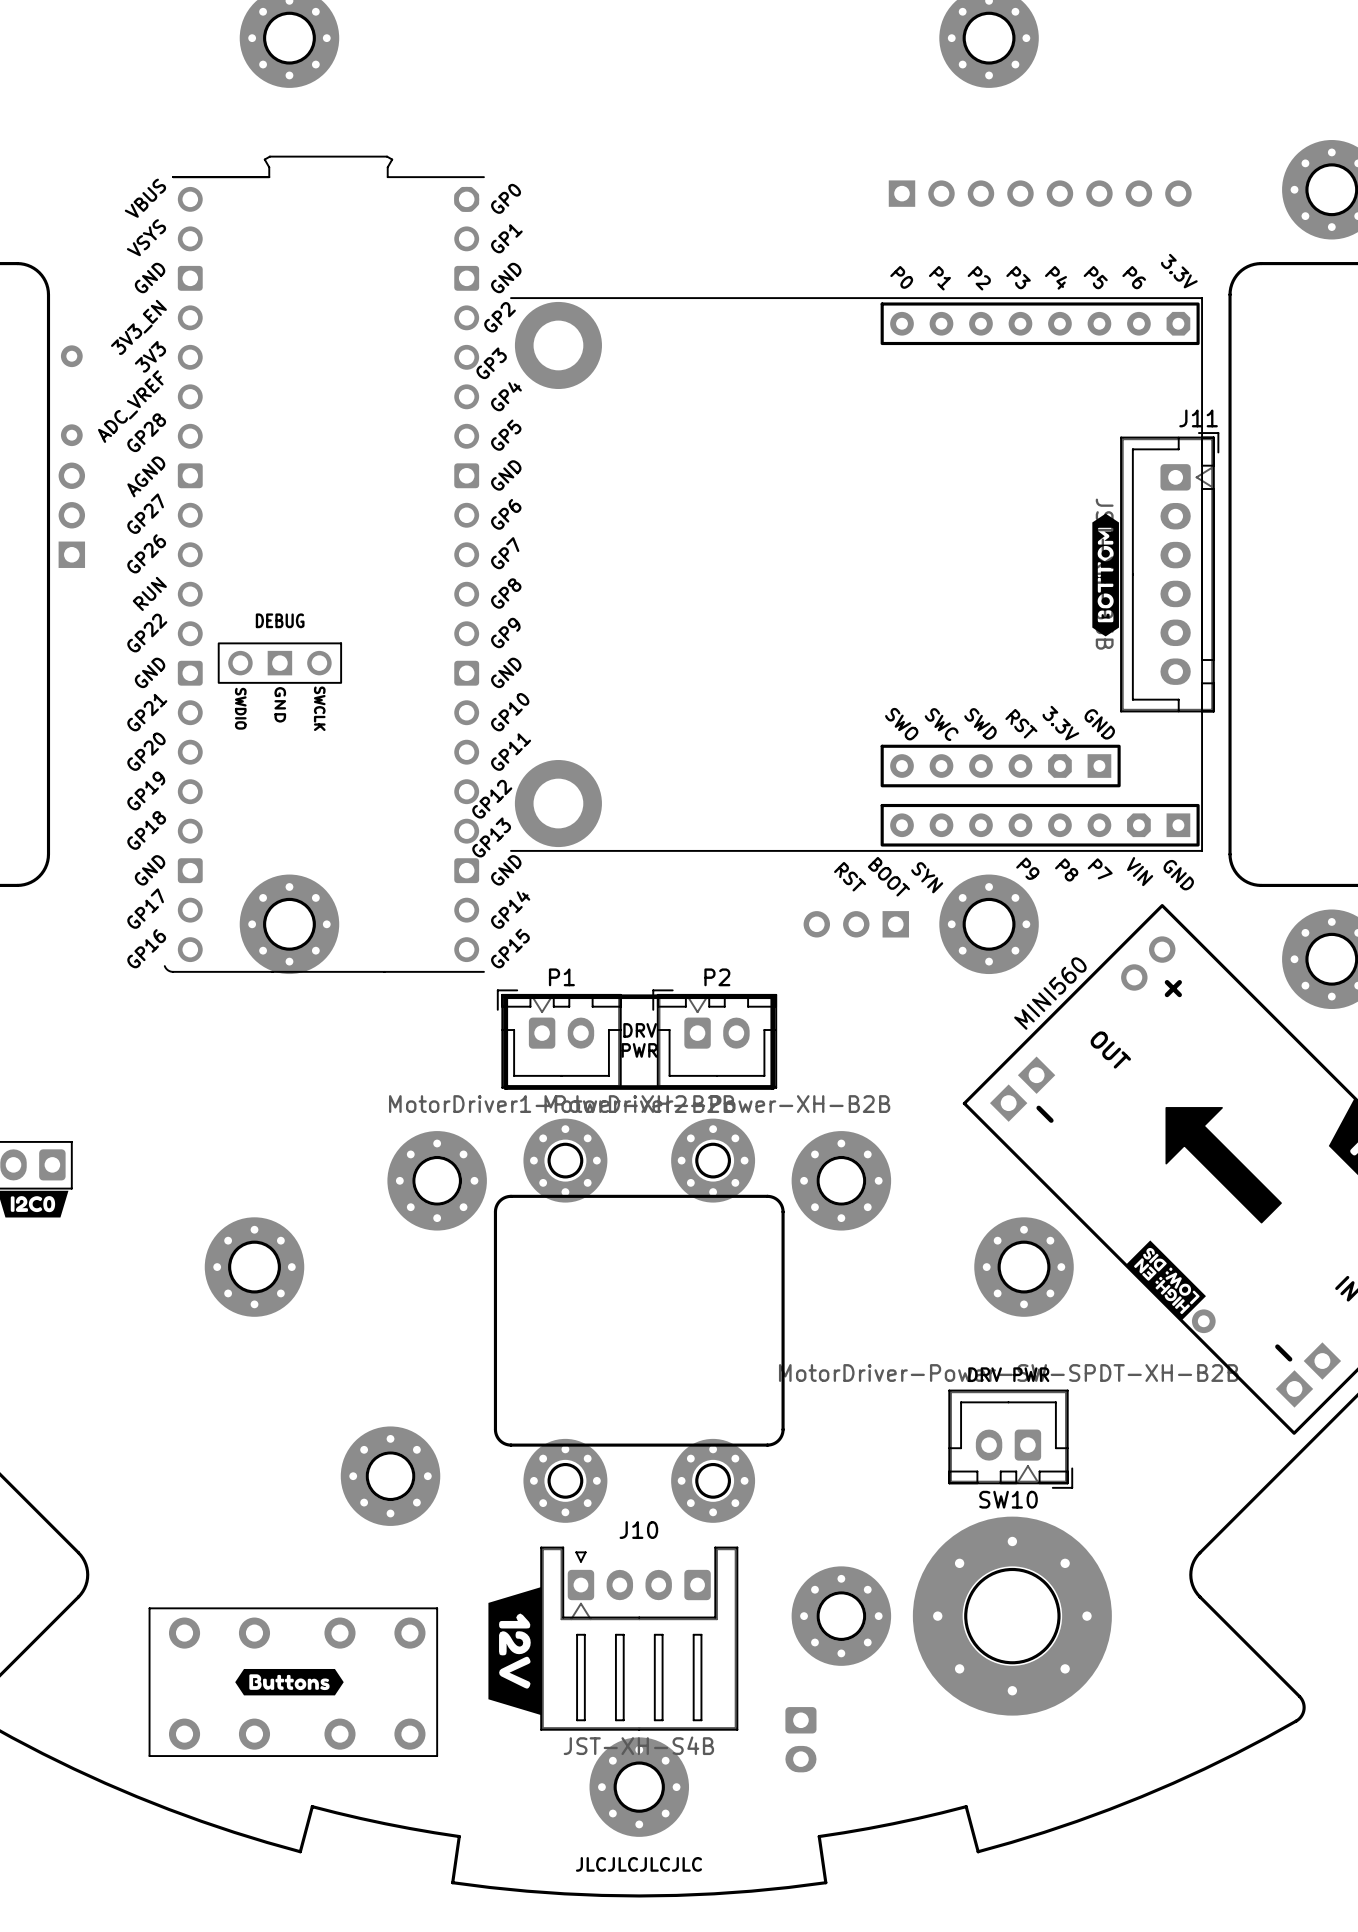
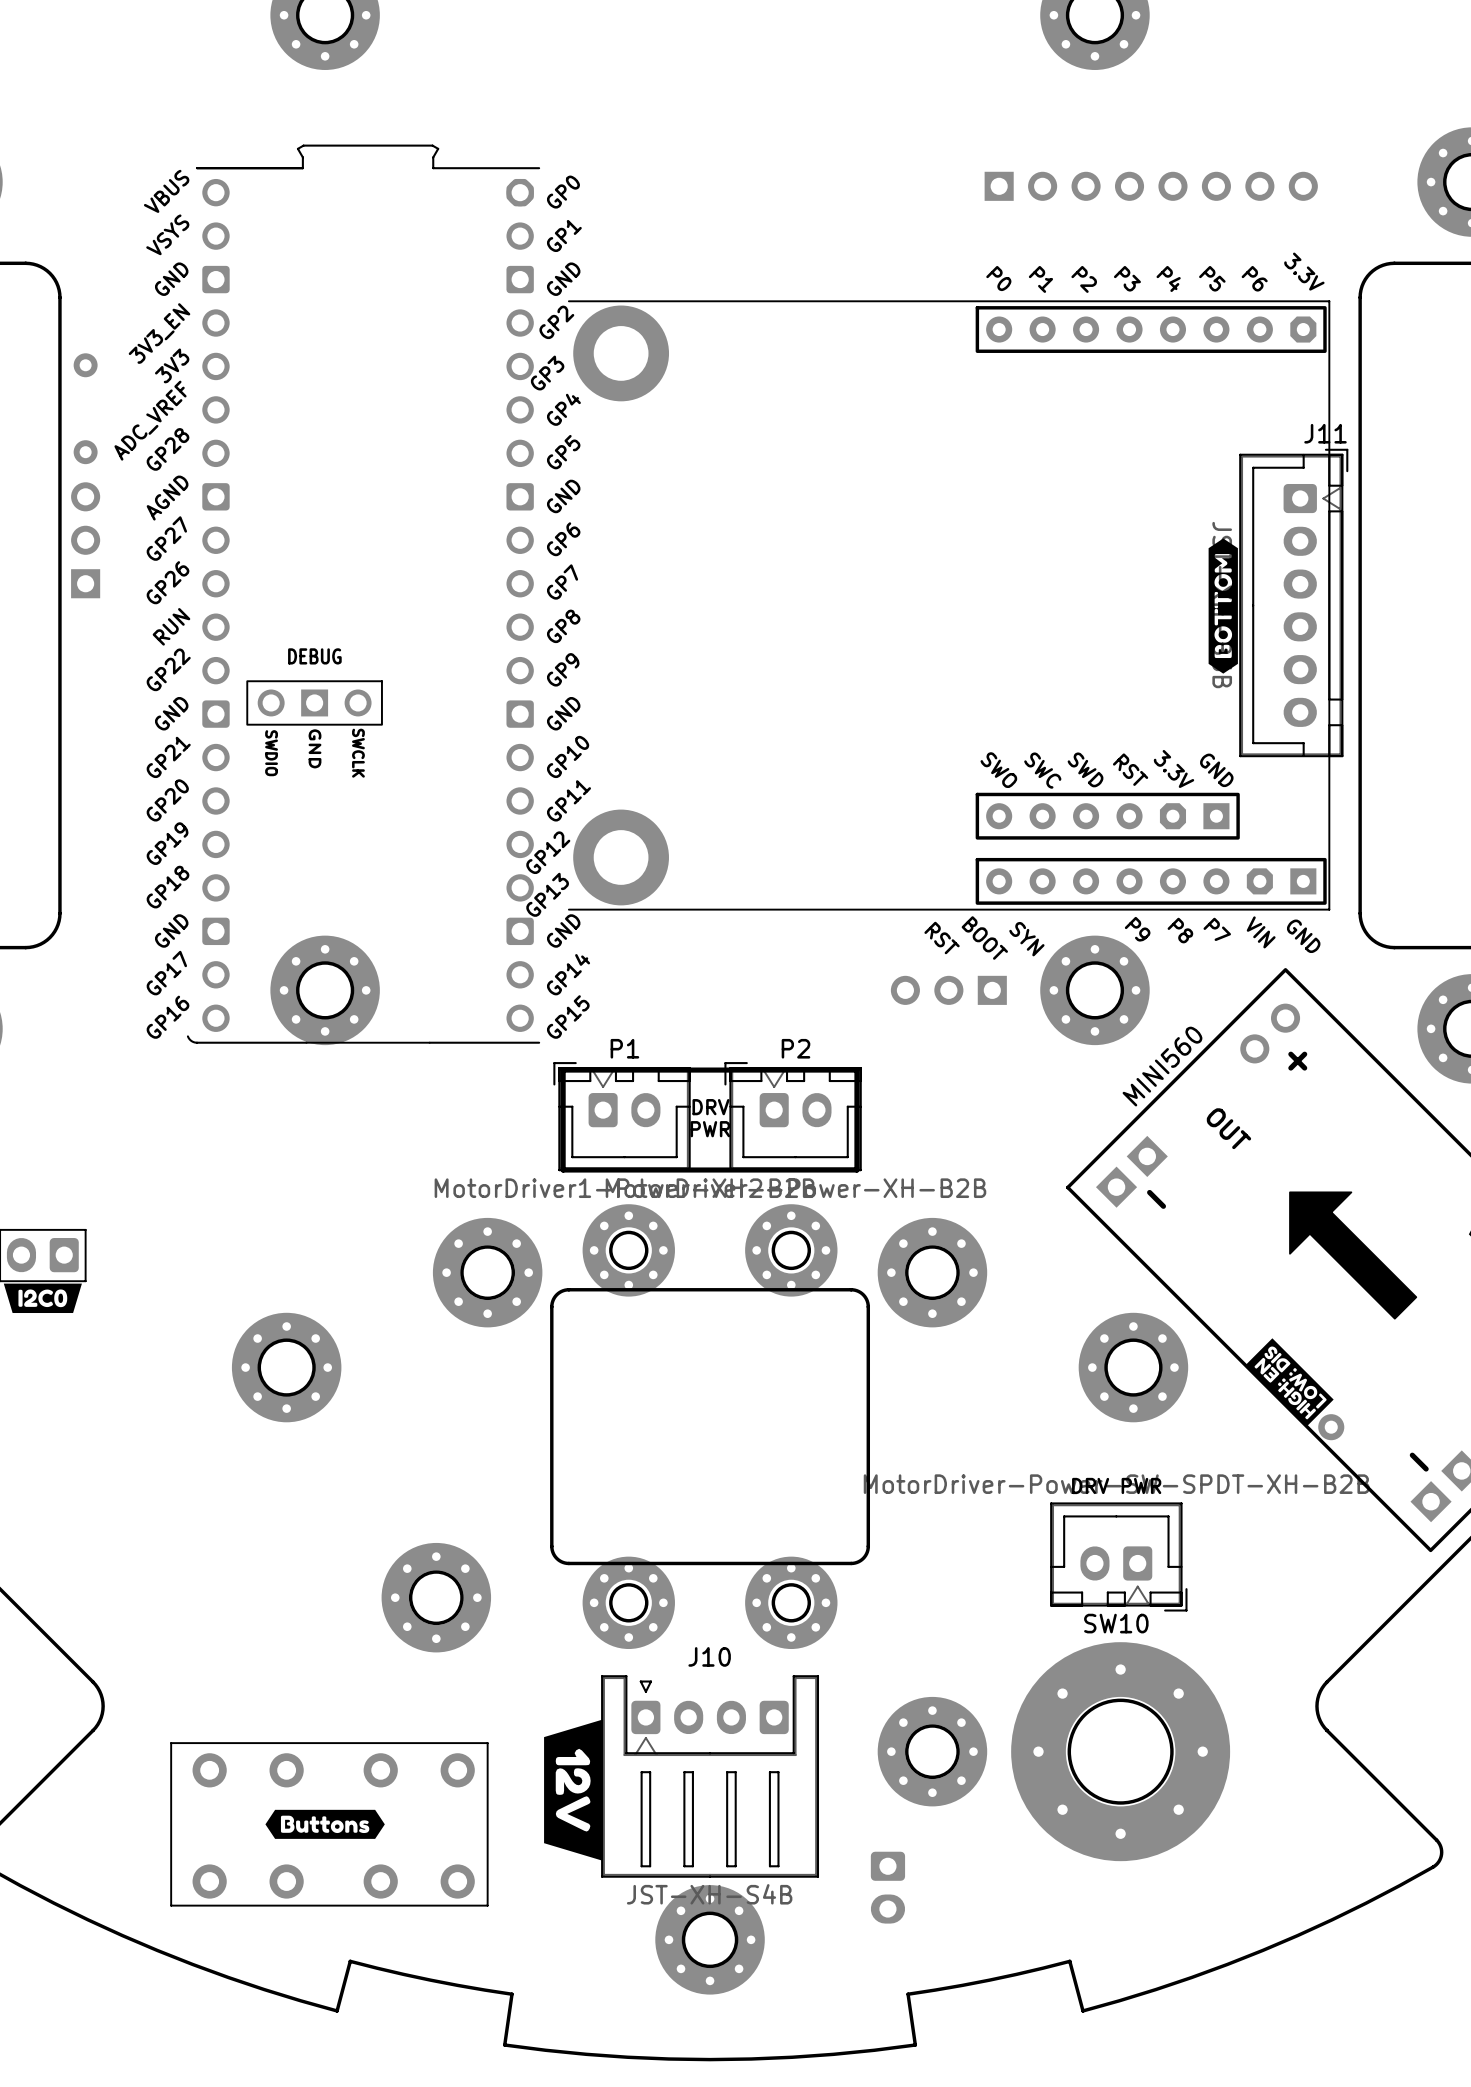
text: JLCJLCJLCJLC (638, 1864) -> none

